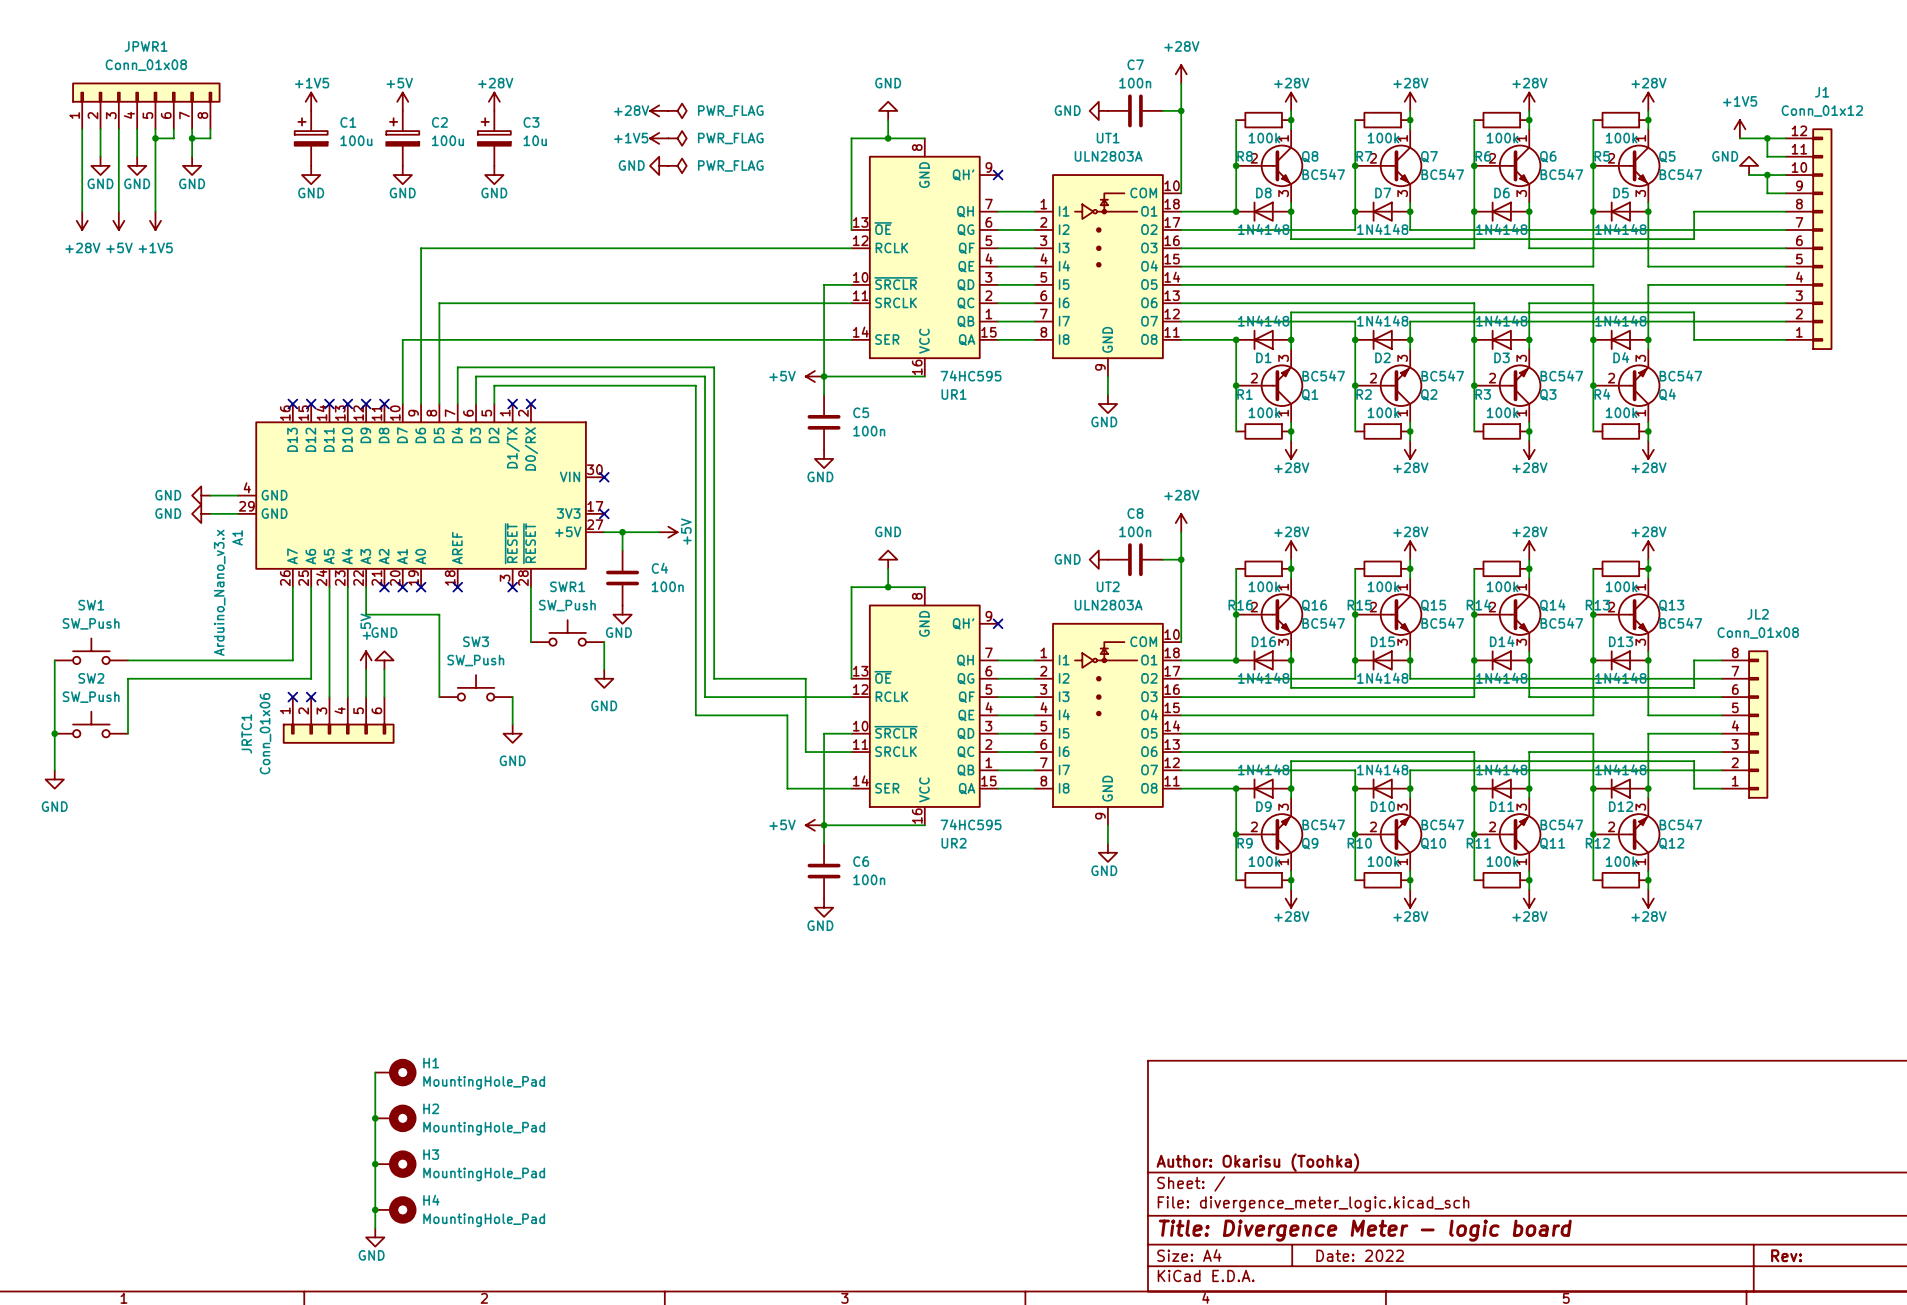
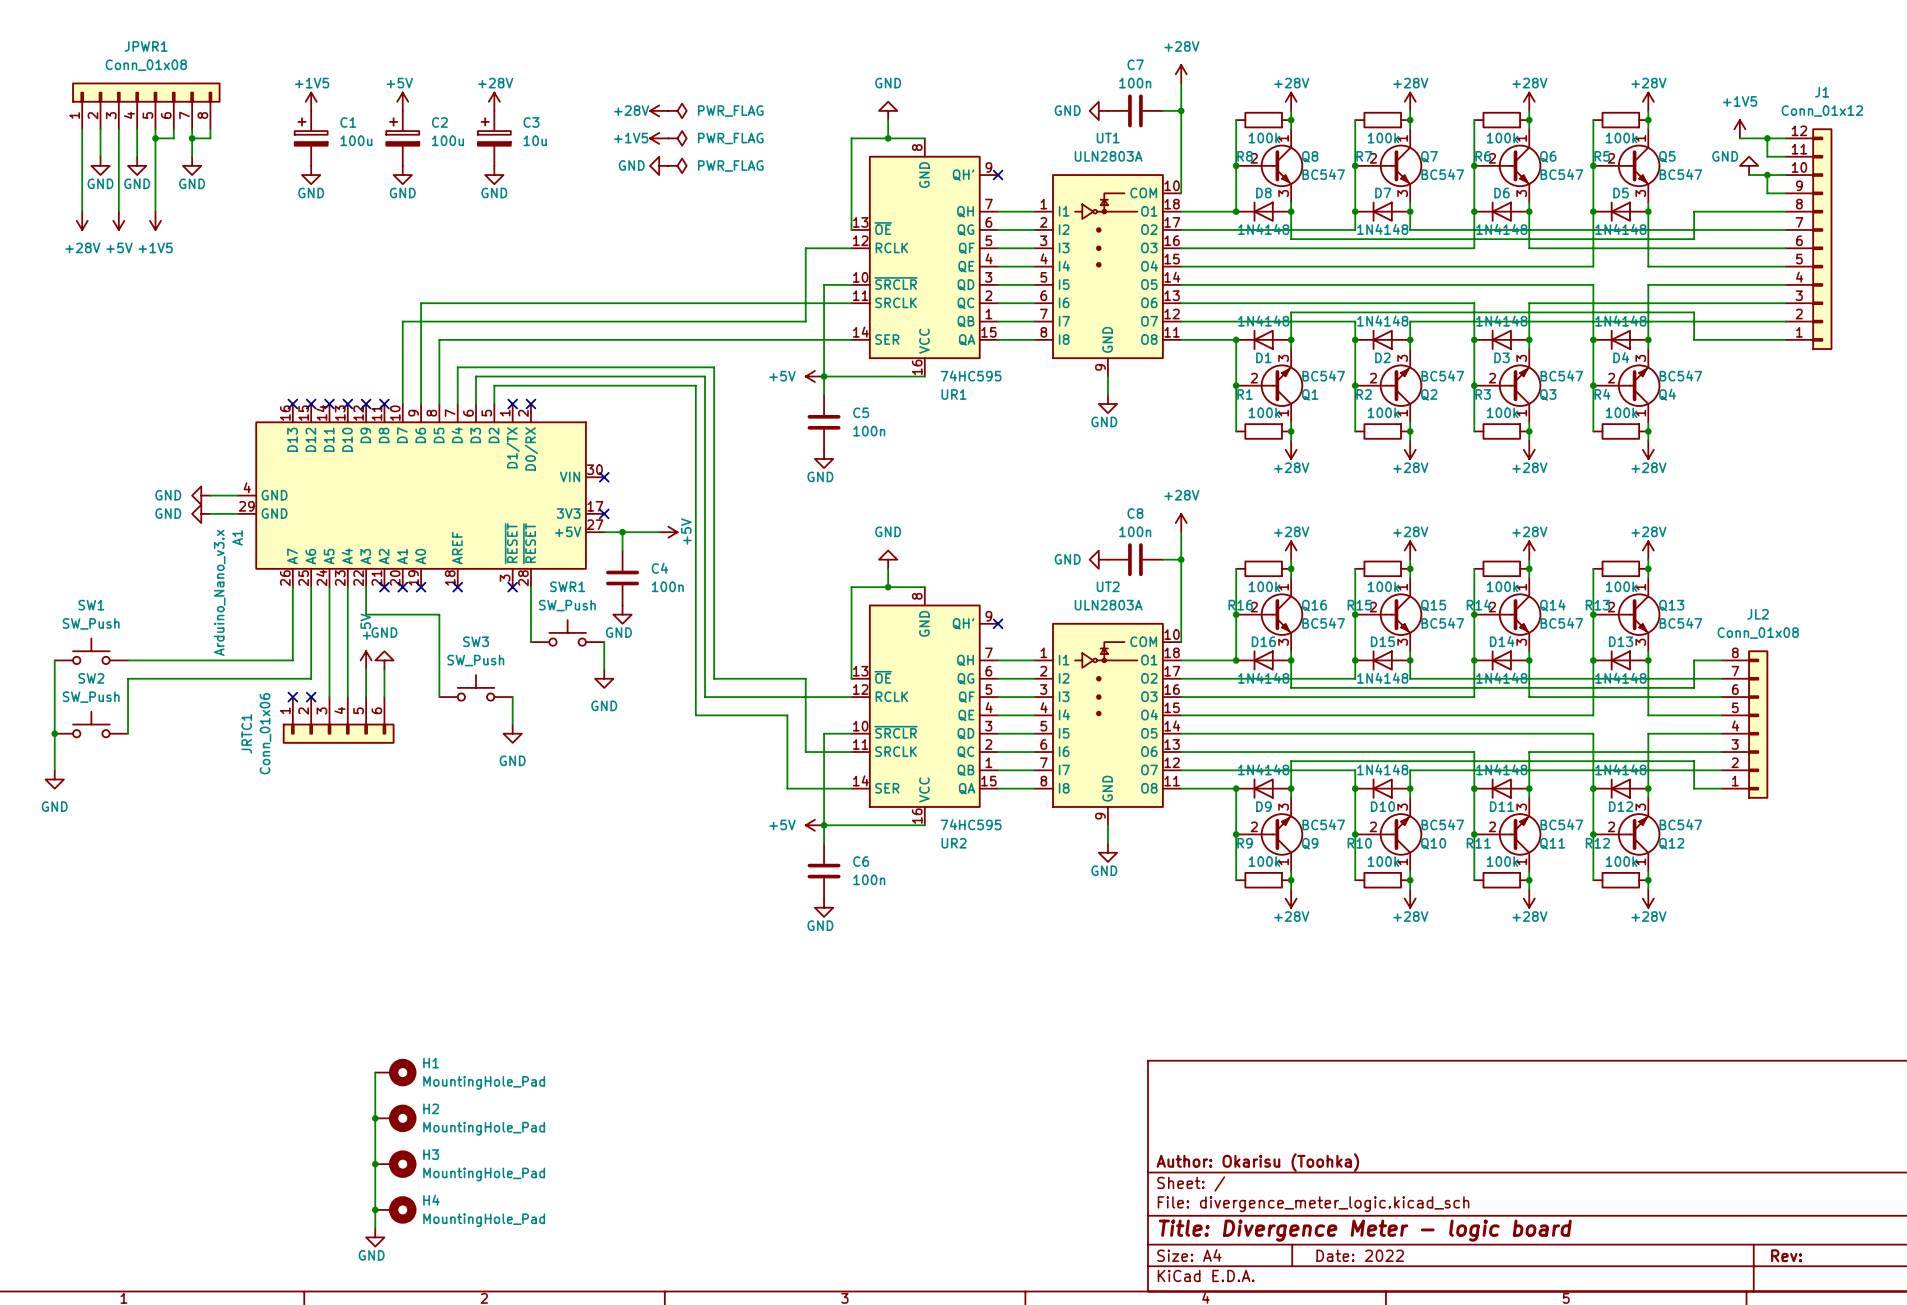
wire: (805, 248) (421, 248) (421, 303) -> (805, 248) (805, 321) (402, 321) (402, 339)
wire: (439, 303) (439, 339) (402, 339) -> (439, 303) (421, 303)

